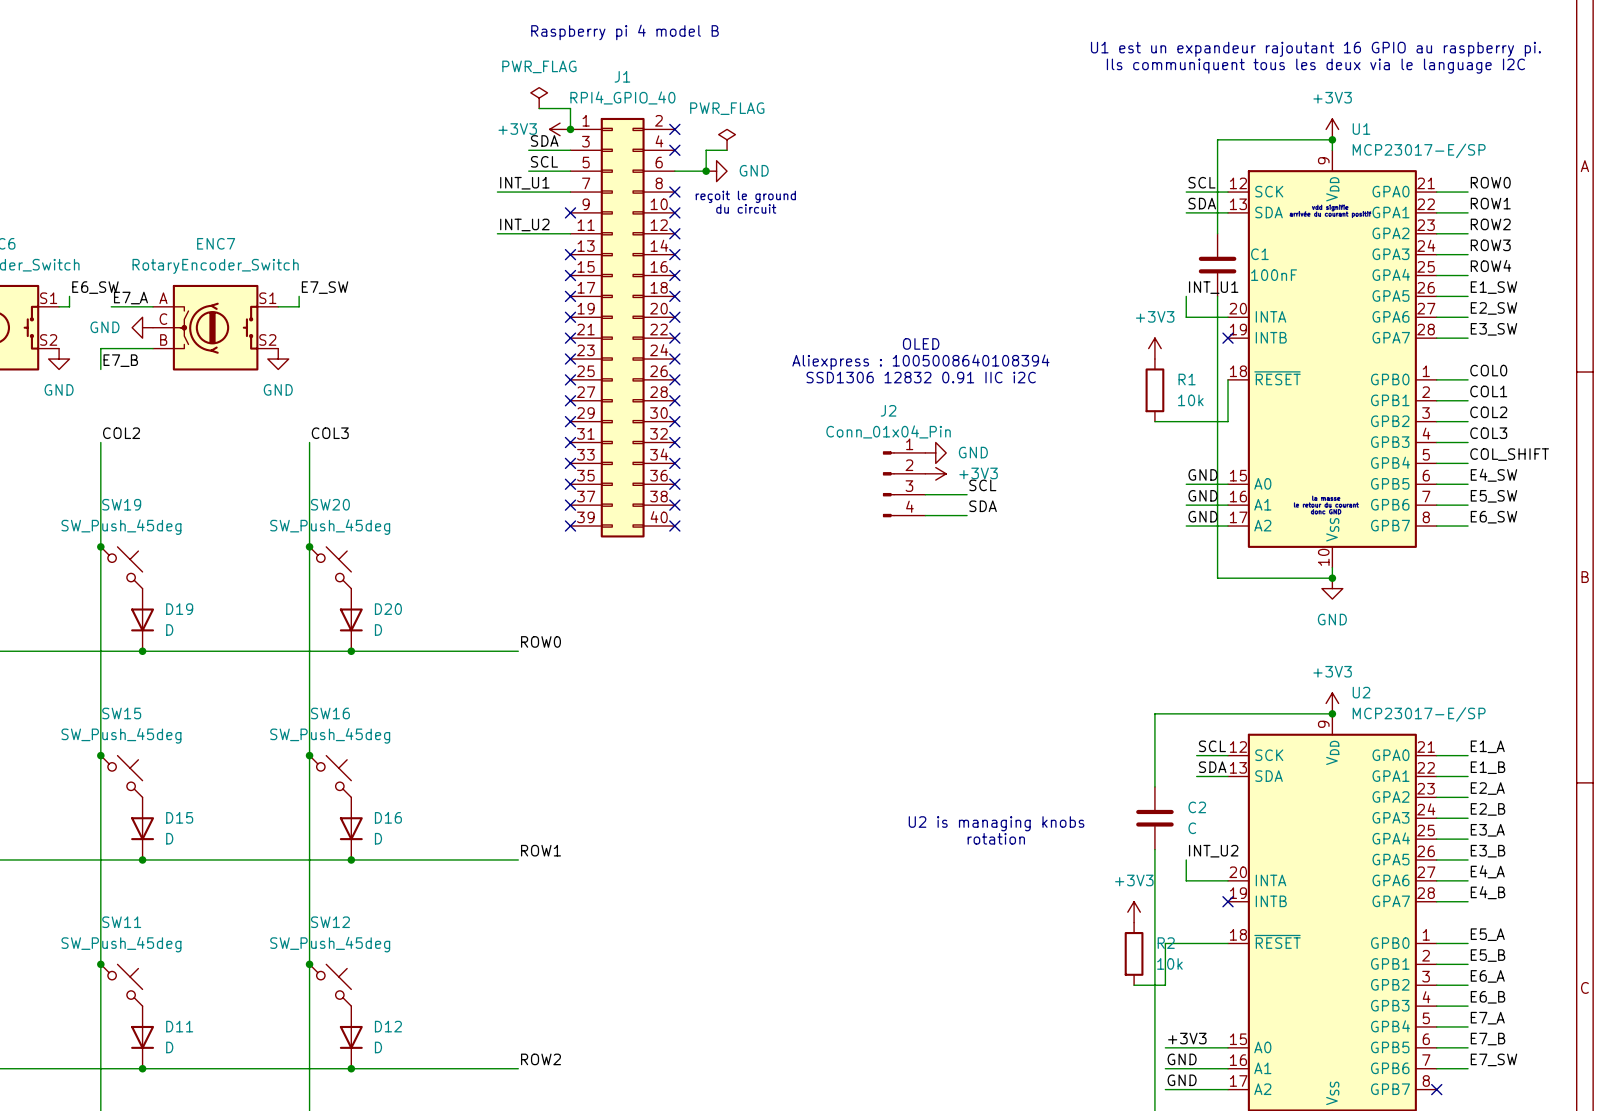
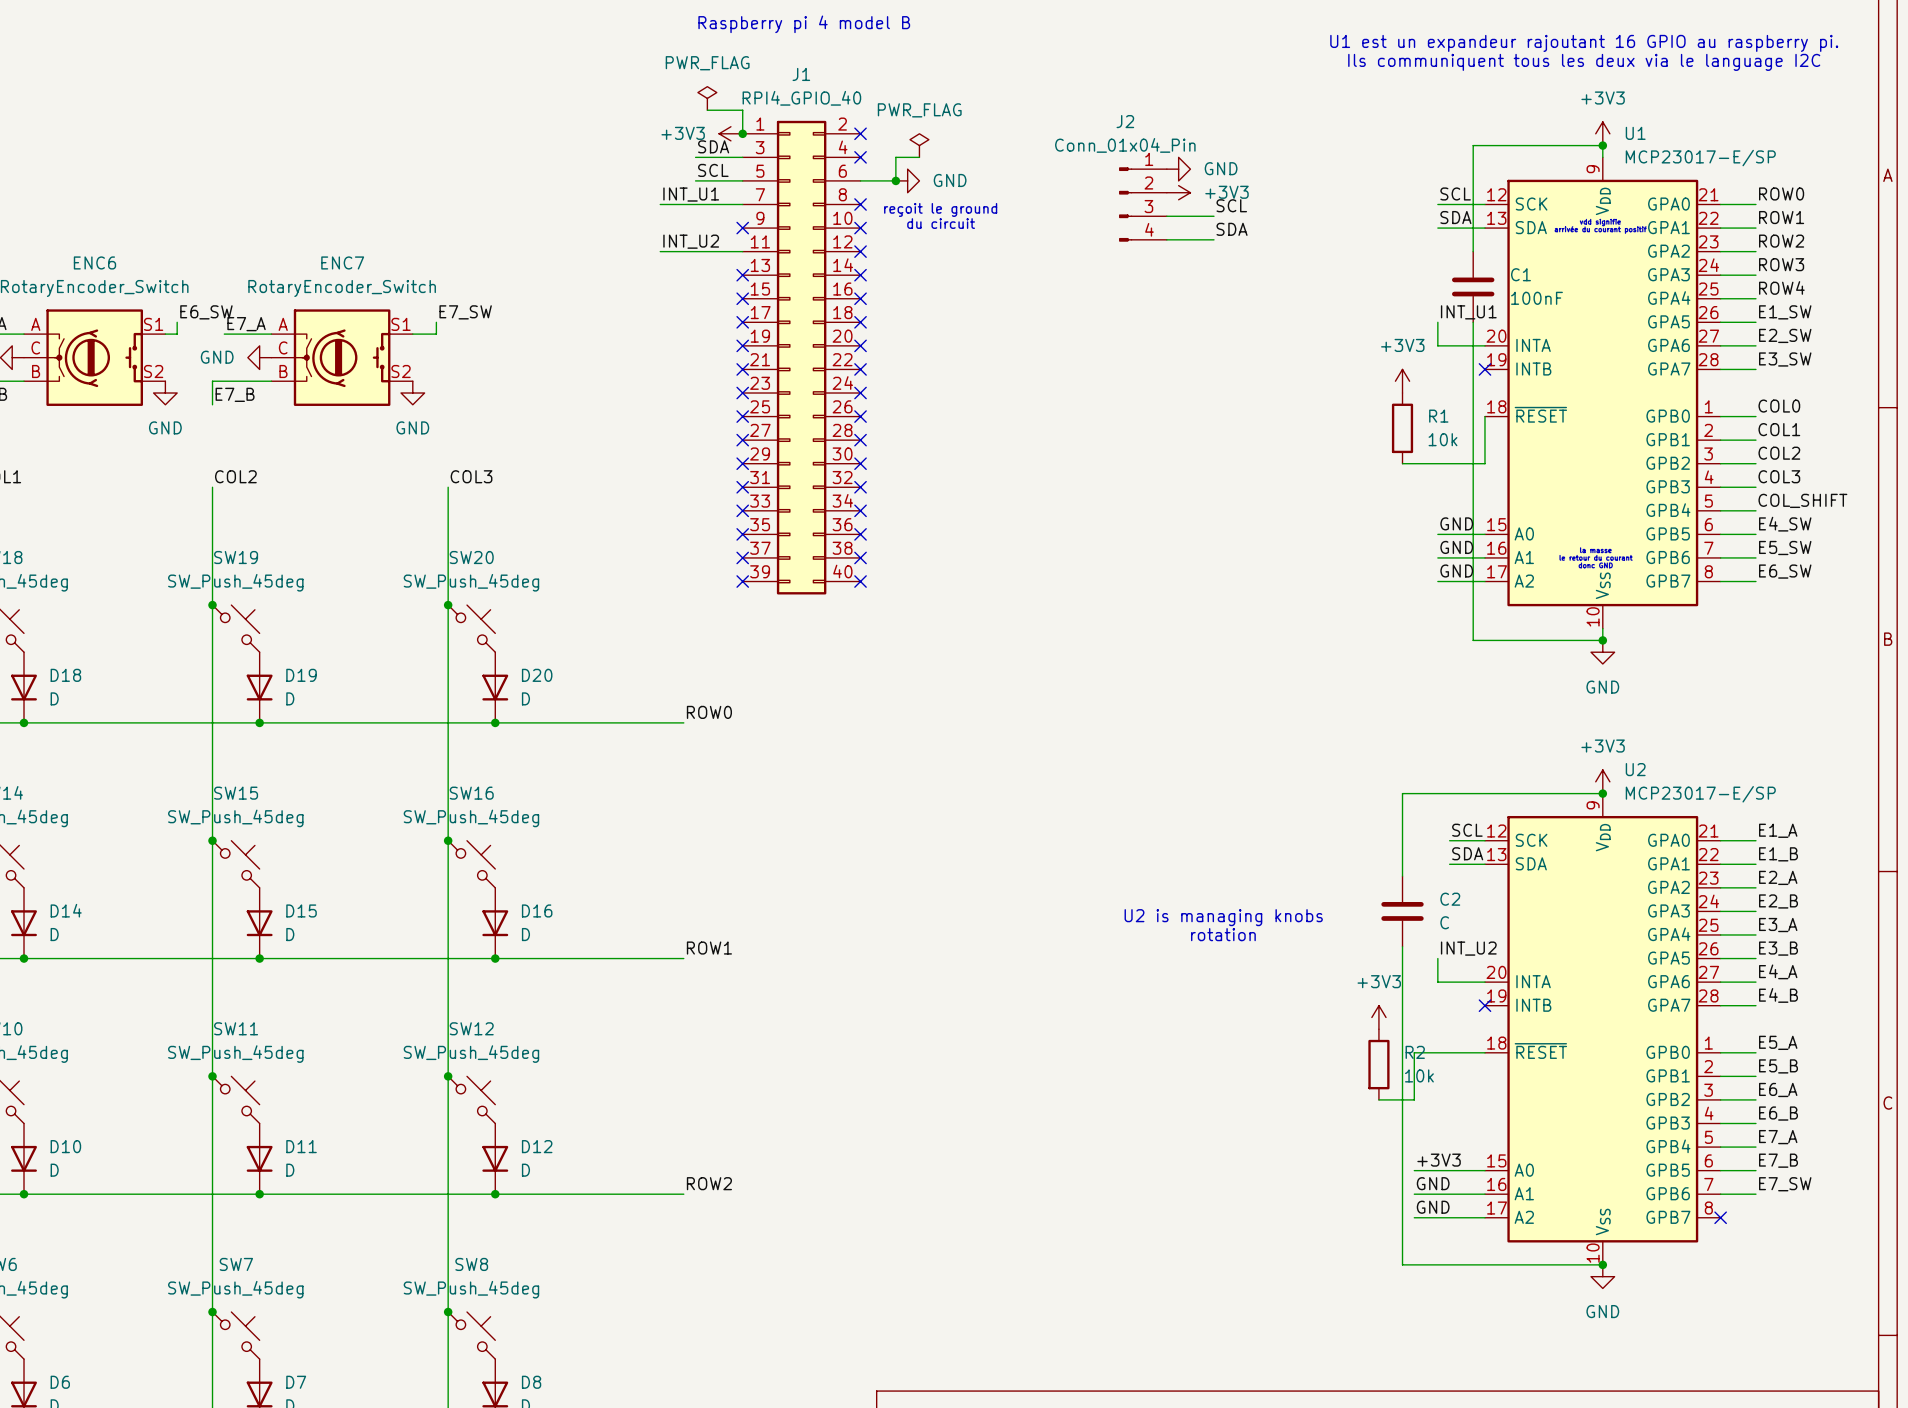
power symbol: none -> GND (1178, 169)
power symbol: none -> +3V3 (1178, 192)
label: none -> SCL (1231, 205)
wire: none -> (1166, 216) (1213, 216)
label: none -> SDA (1232, 229)
wire: none -> (1166, 239) (1213, 239)
text: OLED (921, 343) -> none
text: Aliexpress : 1005008640108394 (920, 362) -> none
text: SSD1306 12832 0.91 IIC i2C (921, 377) -> none
power symbol: GND (935, 452) -> none
power symbol: +3V3 (935, 473) -> none
J2 position: (904, 484) -> (1142, 204)
label: SCL (982, 485) -> none
wire: (925, 494) (967, 494) -> none
label: SDA (983, 506) -> none
wire: (925, 515) (967, 515) -> none

